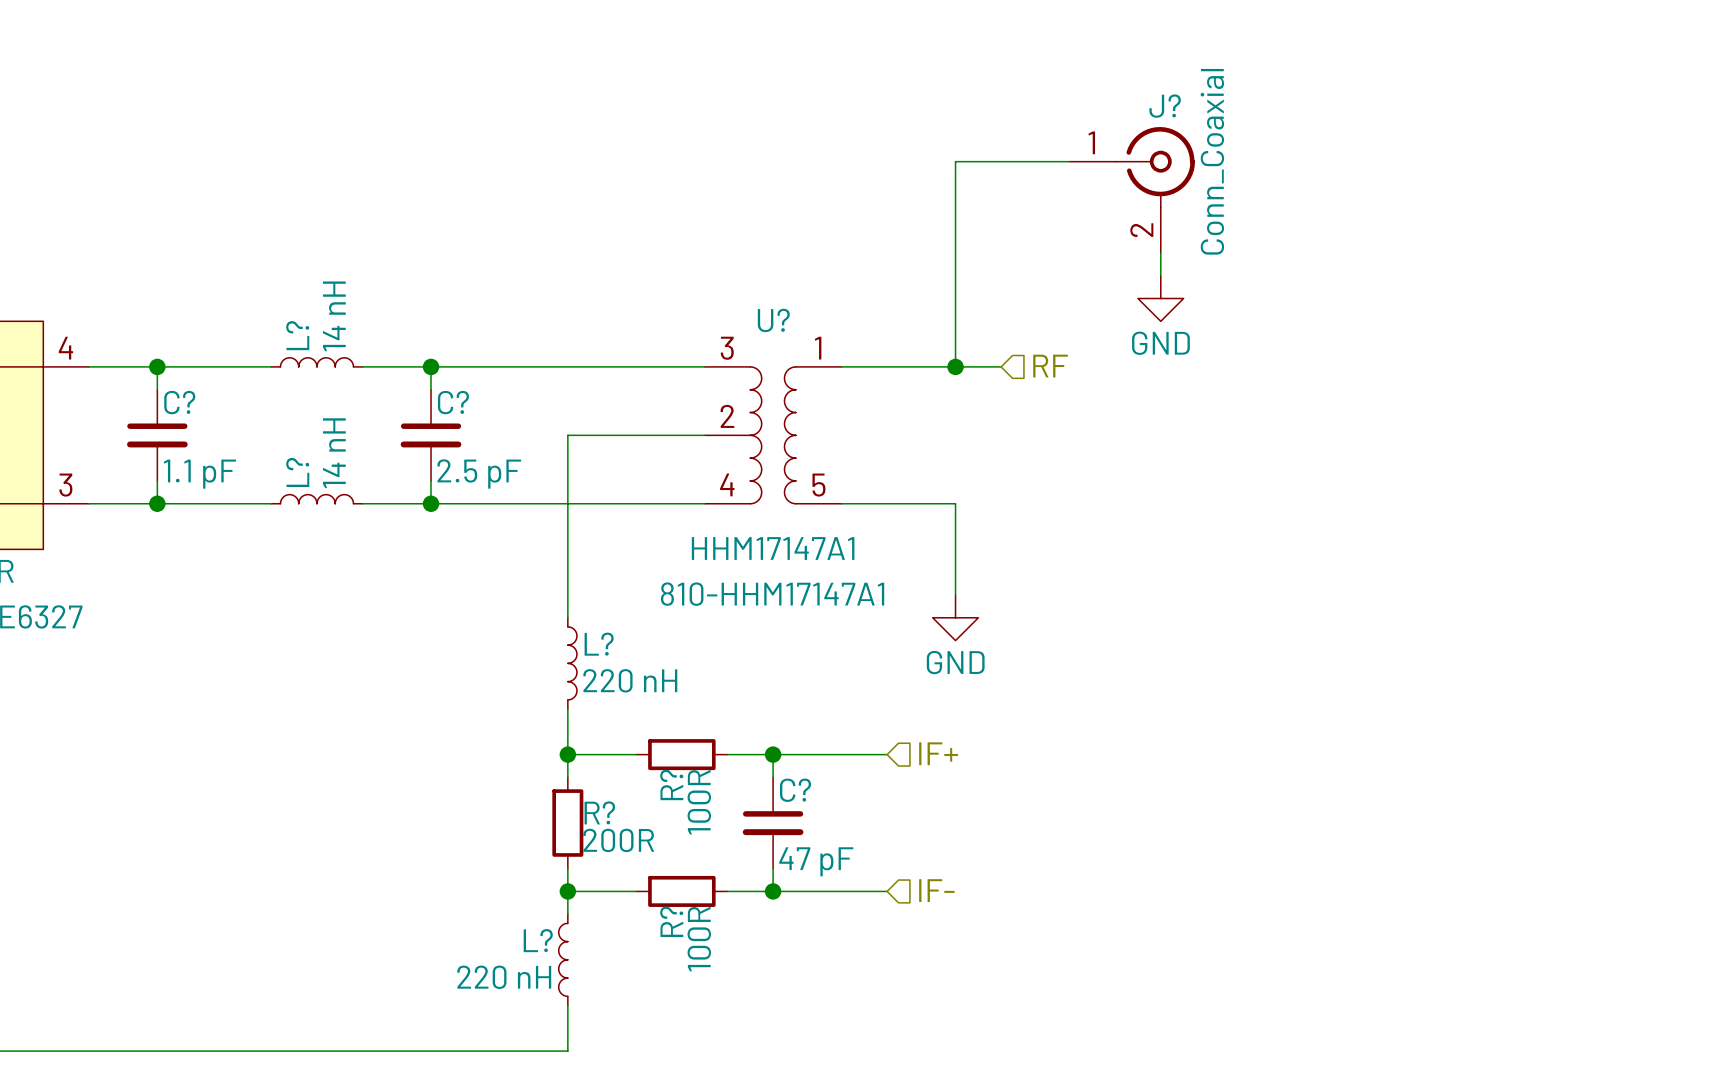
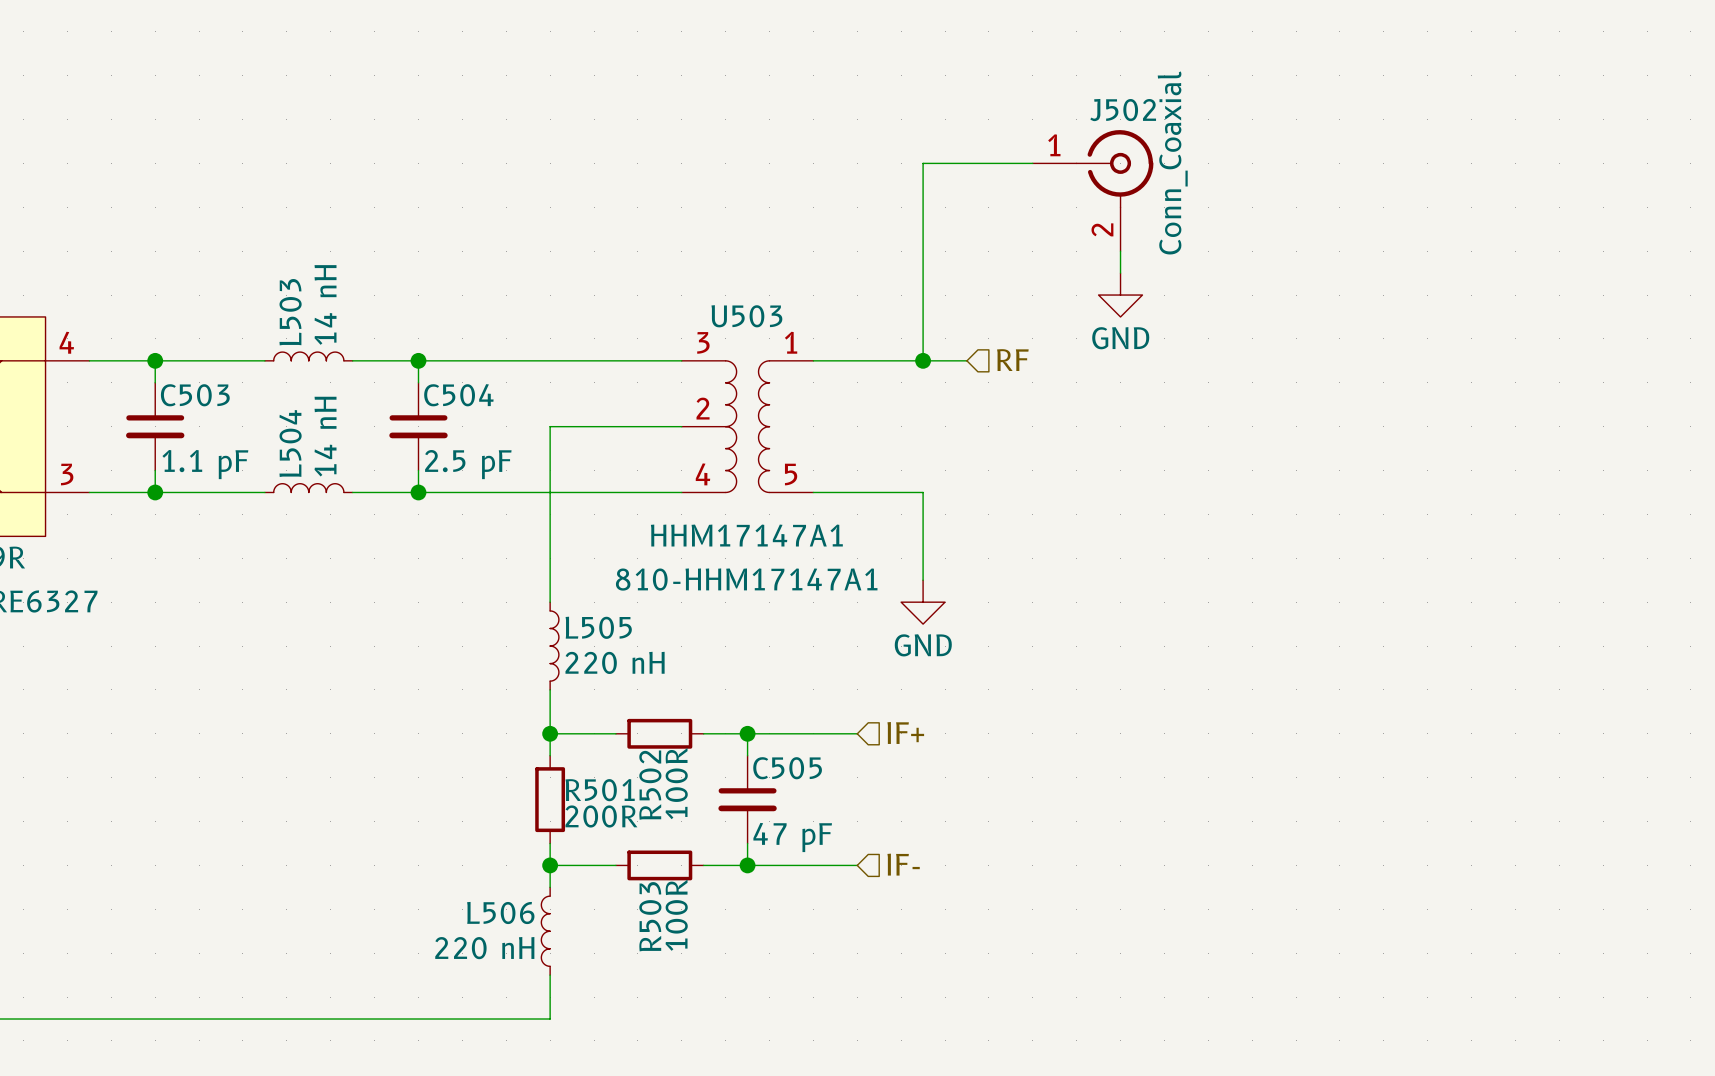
J? name: J? (1165, 106) -> J502 (1123, 110)
U? name: U? (773, 320) -> U503 (746, 316)
L? name: L? (297, 335) -> L503 (290, 312)
C? name: C? (179, 402) -> C503 (195, 395)
C? name: C? (453, 402) -> C504 (458, 395)
L? name: L? (297, 472) -> L504 (290, 443)
L? name: L? (599, 644) -> L505 (598, 627)
R? name: R? (671, 784) -> R502 (650, 785)
C? name: C? (795, 790) -> C505 (787, 768)
R? name: R? (599, 812) -> R501 (600, 790)
R? name: R? (671, 921) -> R503 (650, 916)
L? name: L? (538, 940) -> L506 (500, 913)

